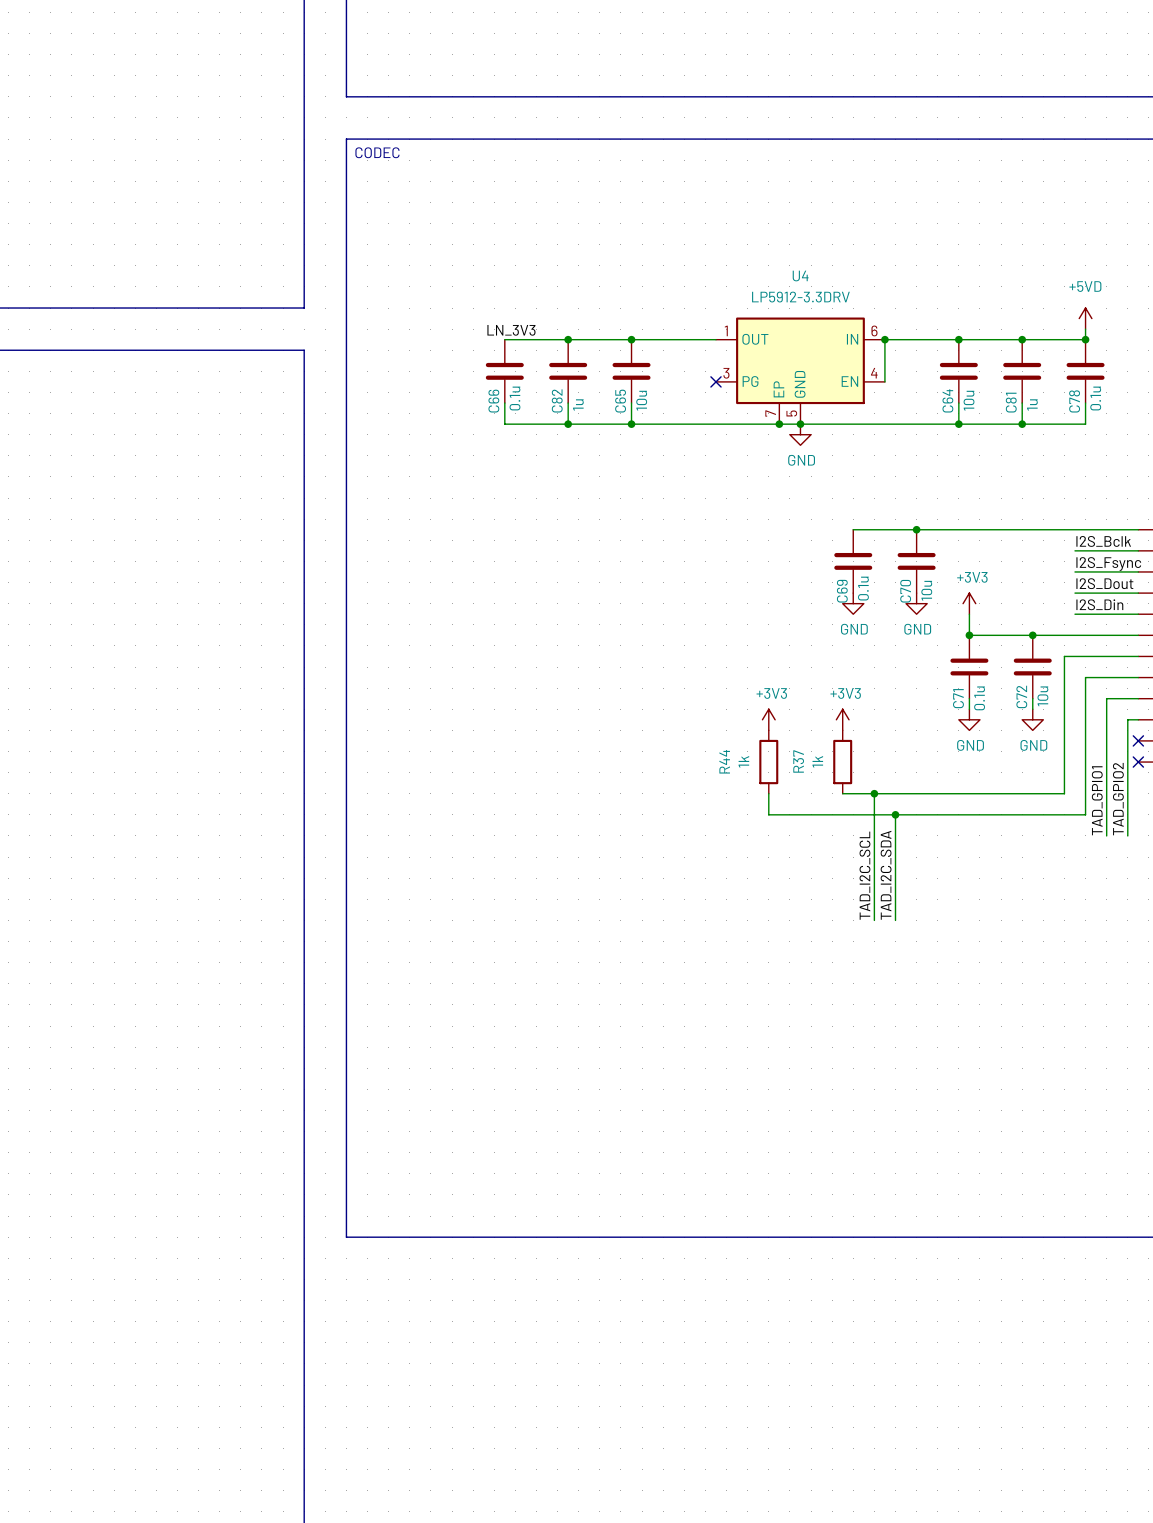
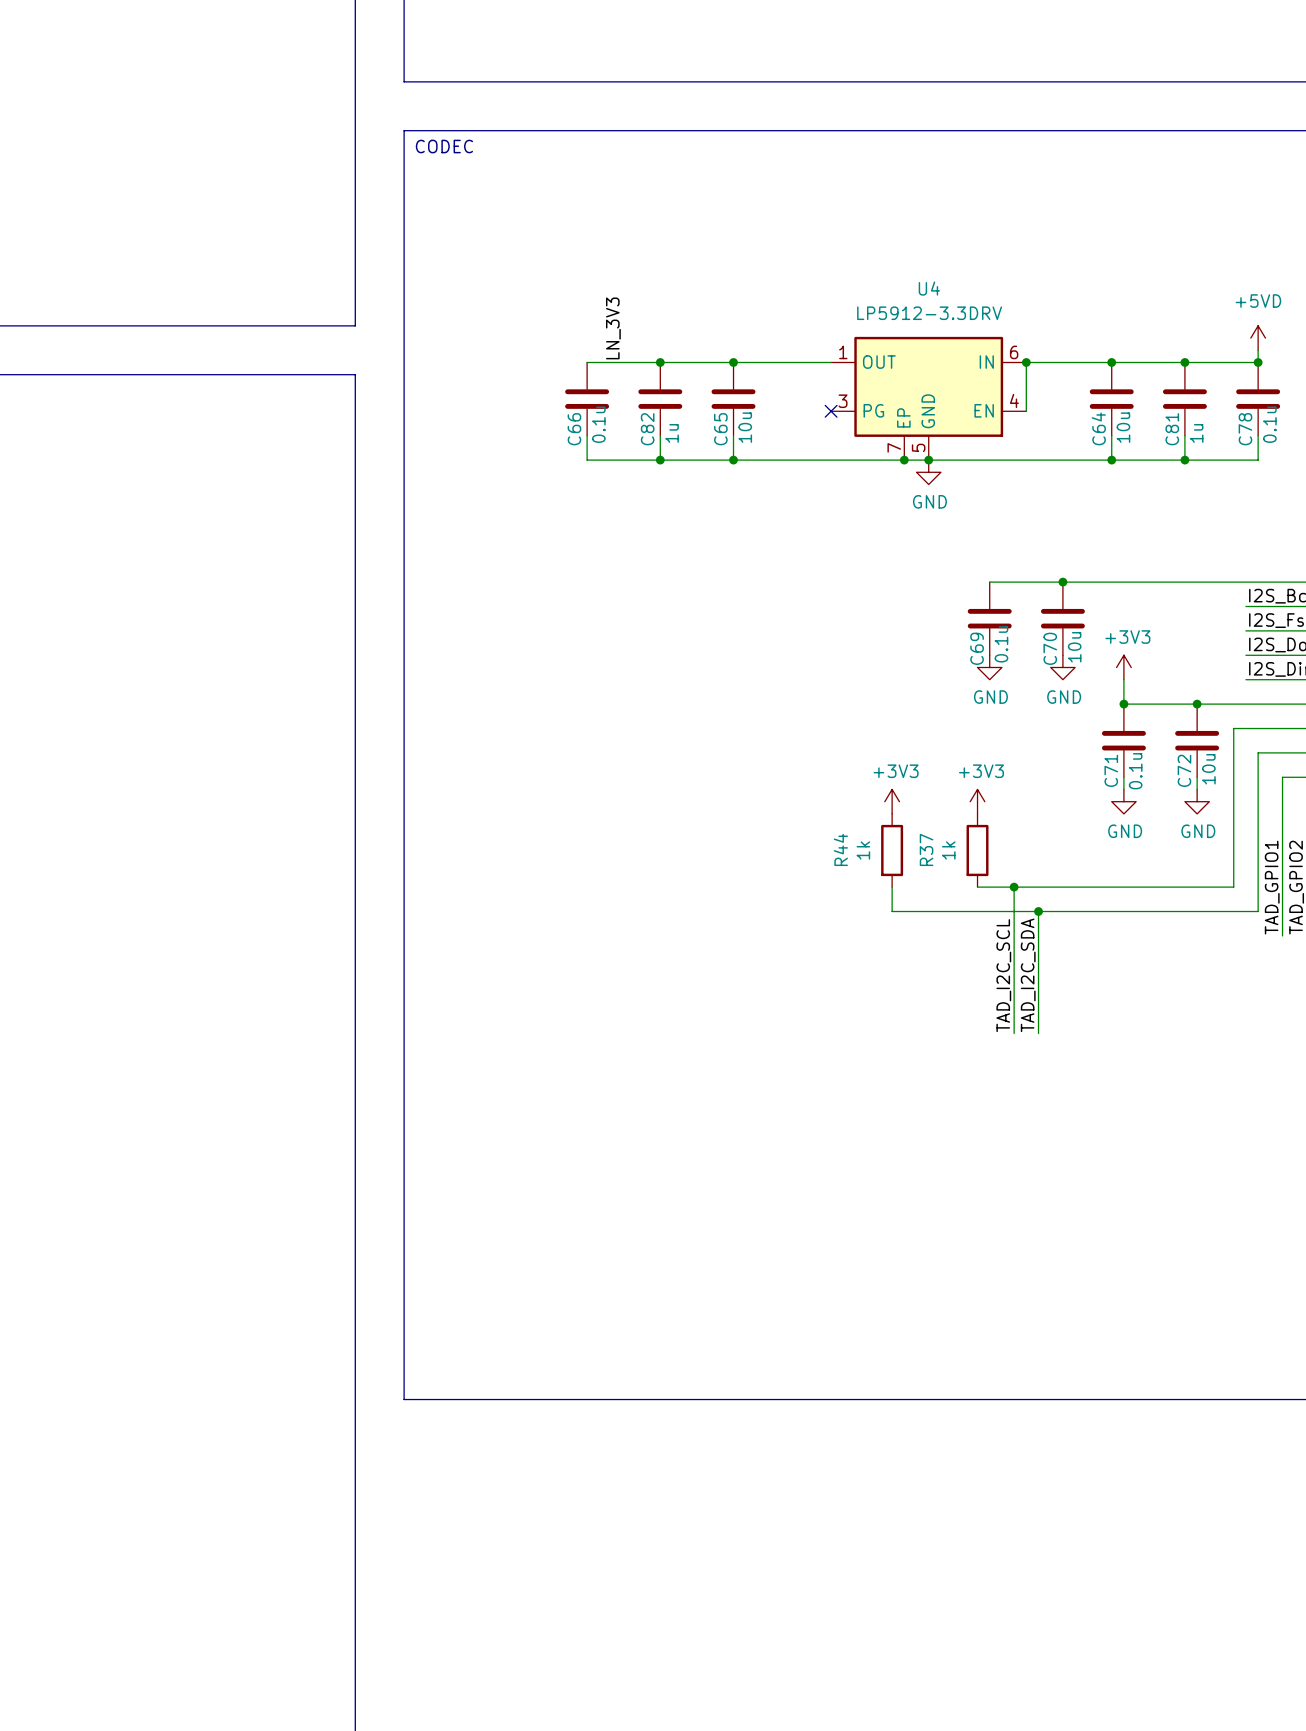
label rotation: 0° (511, 330) -> 90° counterclockwise (613, 328)

